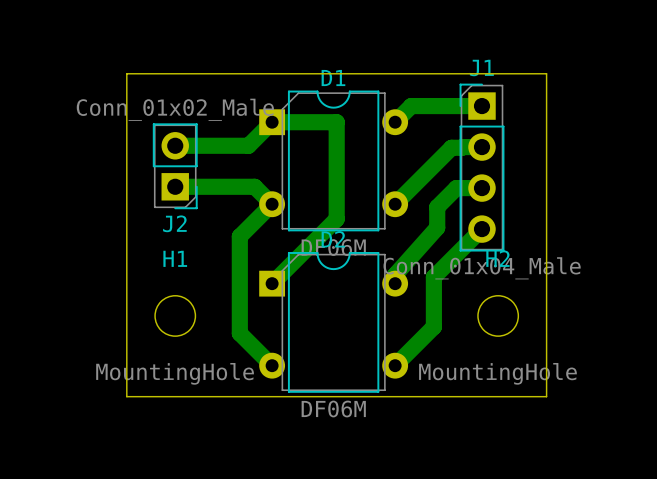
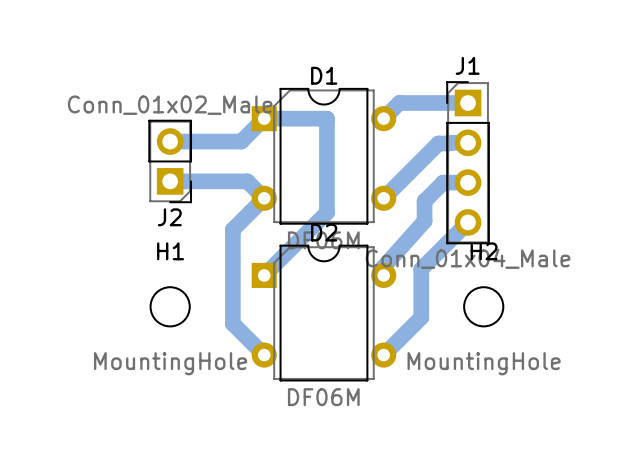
board edge: (126, 73) (126, 396) (546, 396) (546, 73) (126, 73) -> none

